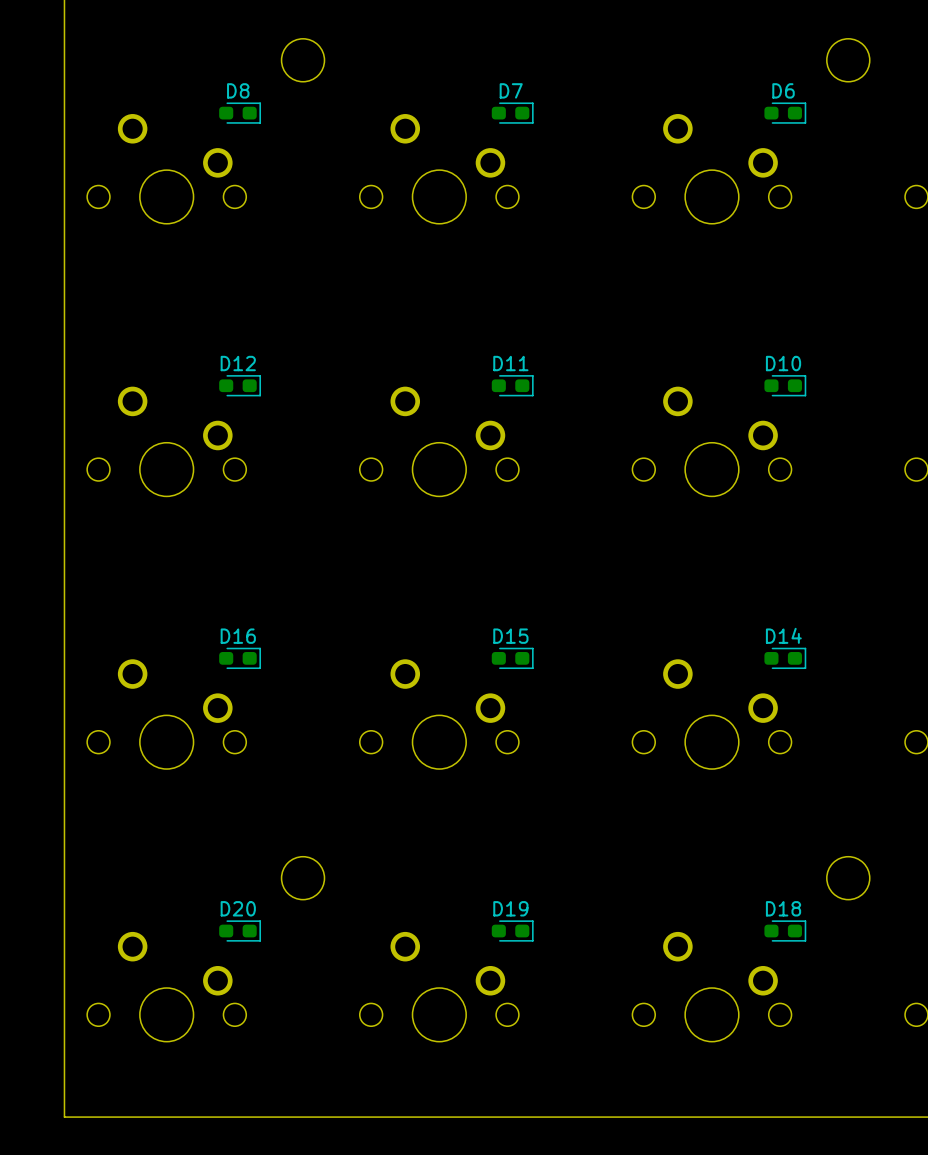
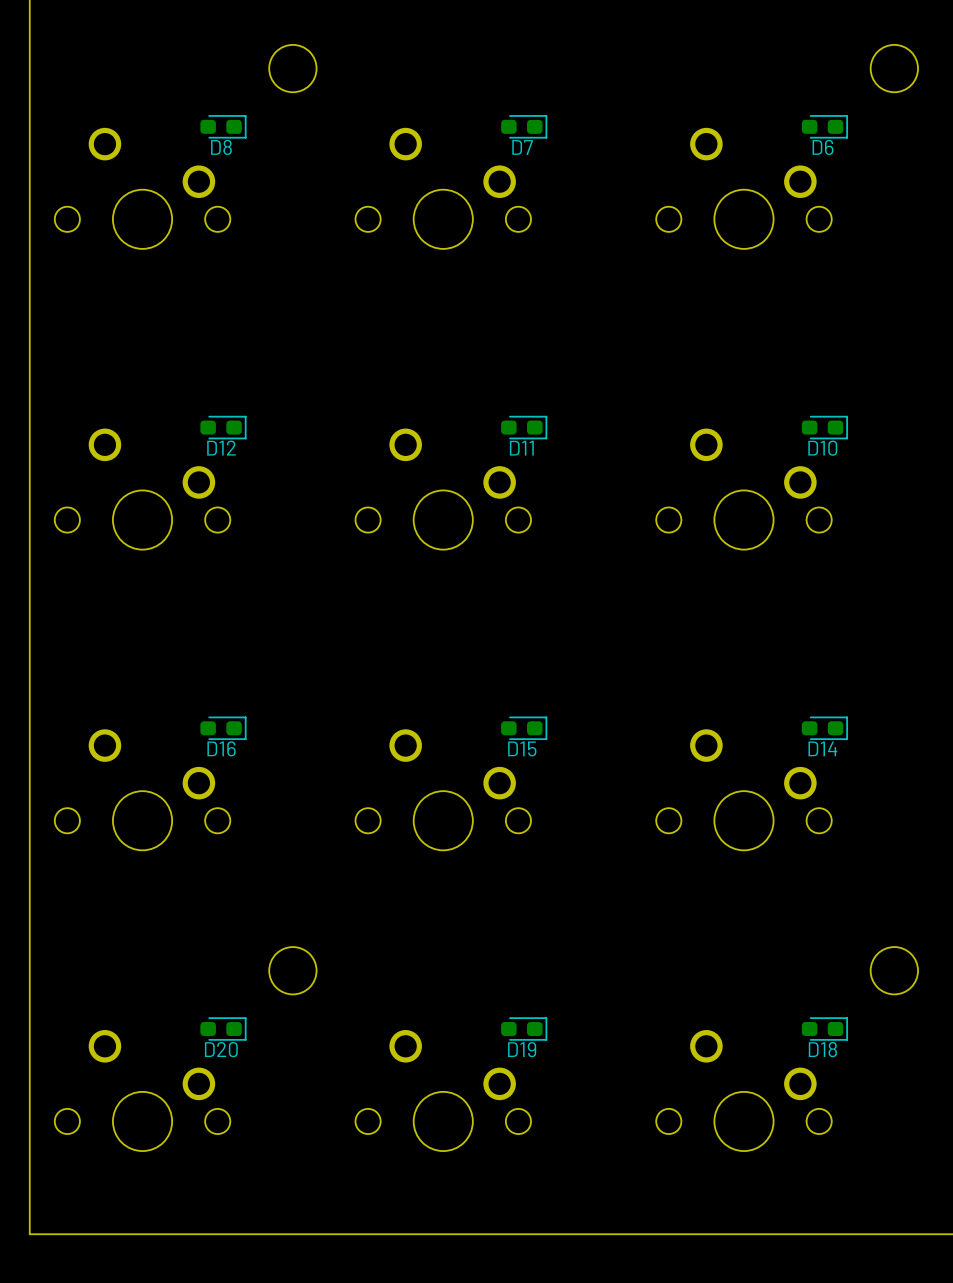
D8 name position: D8 (238, 90) -> D8 (221, 147)
D7 name position: D7 (511, 90) -> D7 (522, 147)
D6 name position: D6 (783, 90) -> D6 (823, 147)
D12 name position: D12 (238, 363) -> D12 (221, 448)
D11 name position: D11 (510, 363) -> D11 (521, 448)
D10 name position: D10 (783, 363) -> D10 (822, 448)
D14 name position: D14 (783, 635) -> D14 (822, 748)
D16 name position: D16 (238, 636) -> D16 (221, 748)
D15 name position: D15 (510, 636) -> D15 (522, 748)
D20 name position: D20 (238, 908) -> D20 (221, 1049)
D19 name position: D19 (510, 908) -> D19 (522, 1049)
D18 name position: D18 (783, 908) -> D18 (822, 1049)

